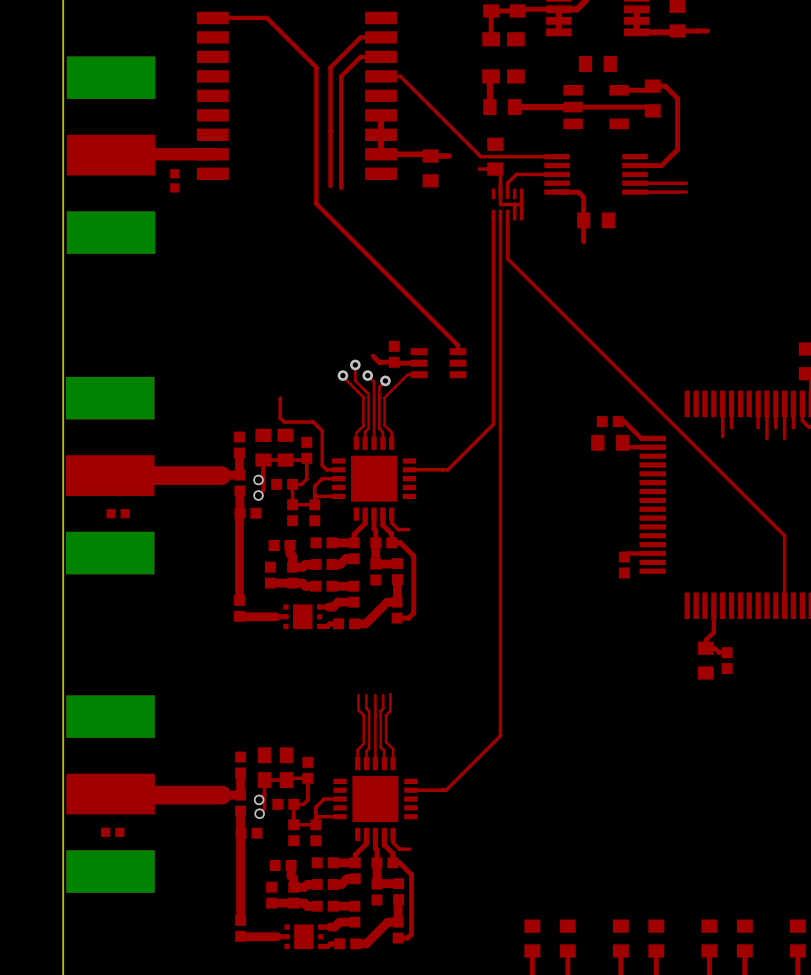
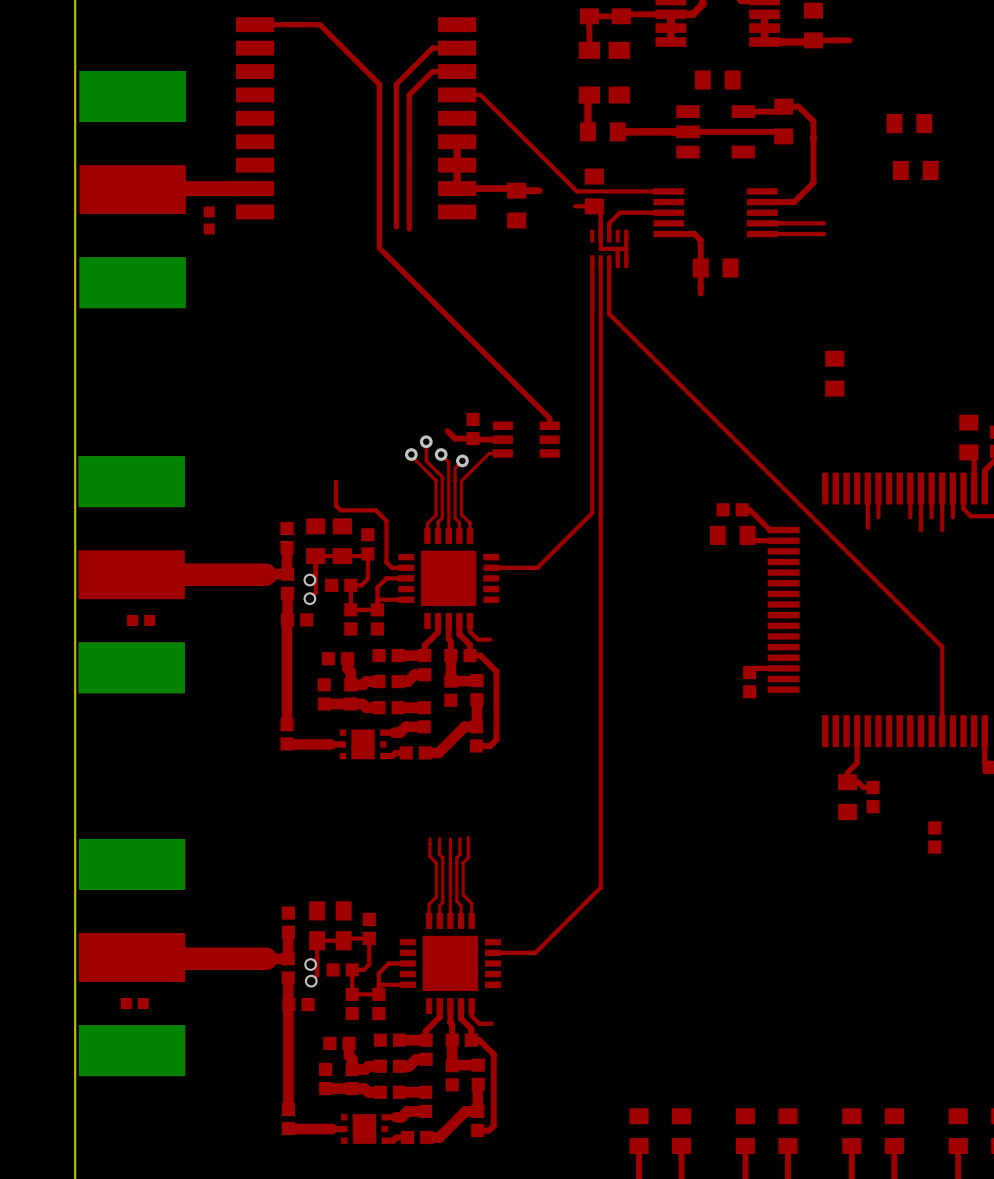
part: none -> (909, 123)
part: none -> (915, 170)
part: none -> (834, 373)
part: none -> (934, 837)

